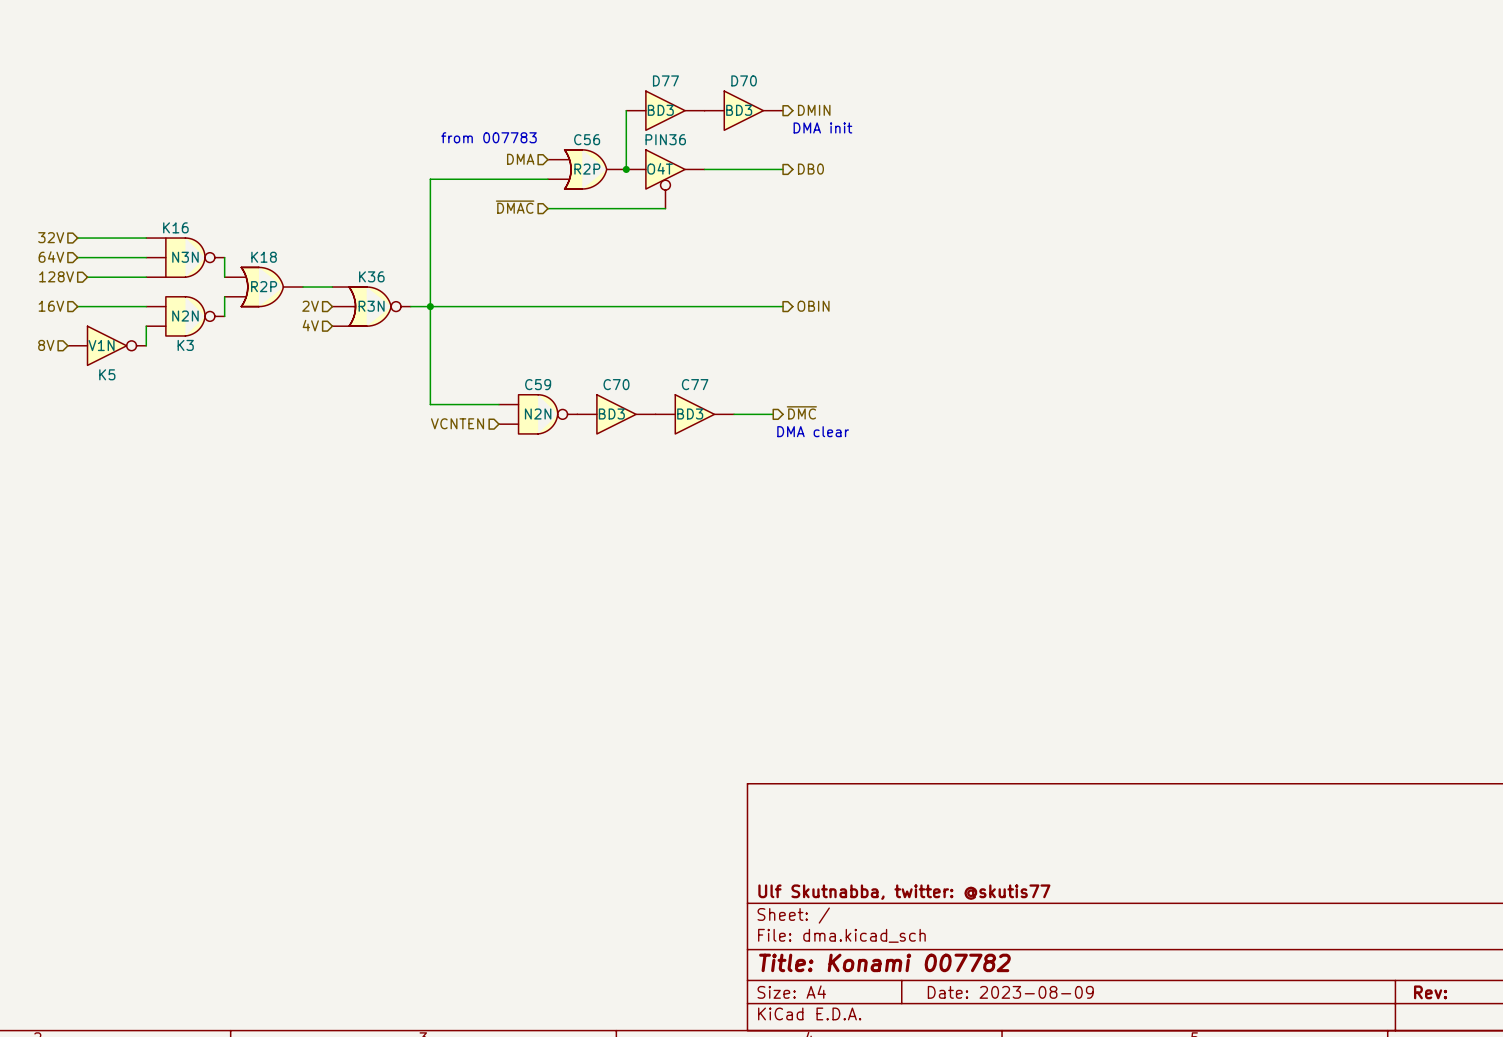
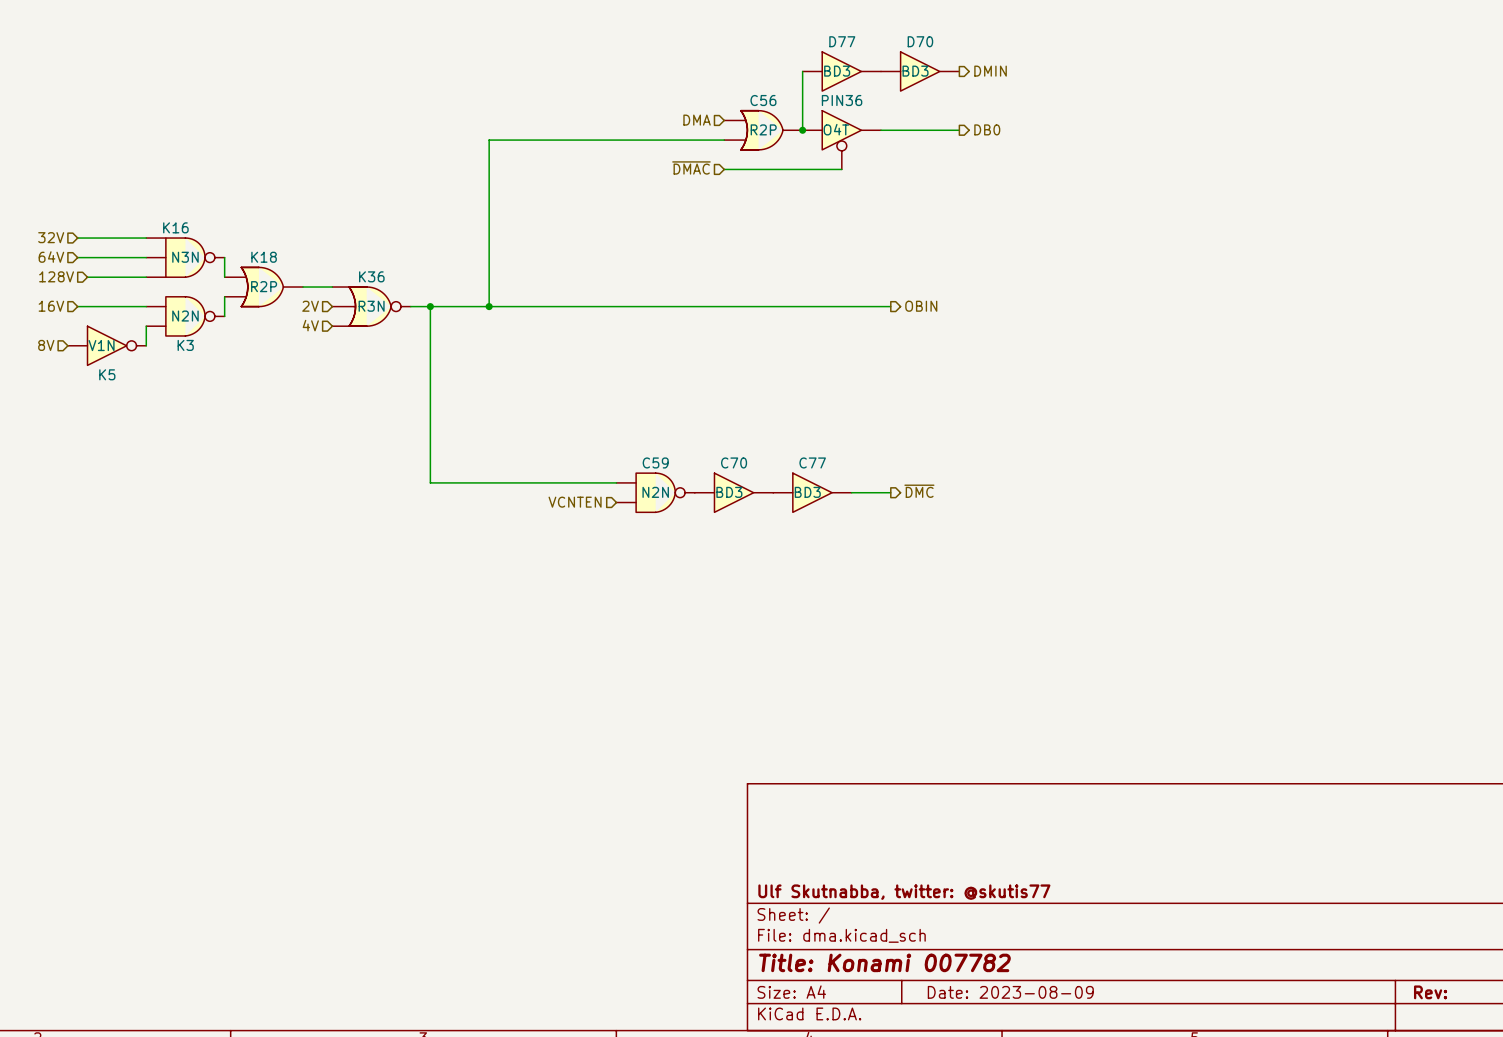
wire: (626, 110) (626, 169) -> (802, 71) (802, 130)
D77 position: (665, 110) -> (841, 71)
D70 position: (743, 110) -> (920, 71)
hierarchical label position: DMIN (814, 110) -> DMIN (990, 71)
text: DMA init (822, 127) -> none
junction: none -> (802, 130)
wire: none -> (881, 130) (959, 130)
text: from 007783 (488, 137) -> none
wire: none -> (724, 140) (489, 140) (489, 306)
hierarchical label position: DMA (520, 159) -> DMA (697, 120)
C56 position: (587, 169) -> (763, 130)
junction: (626, 169) -> none
wire: (704, 169) (724, 169) -> none
wire: none -> (783, 169) (841, 169)
hierarchical label position: DB0 (810, 169) -> DB0 (987, 129)
wire: (547, 179) (430, 179) (430, 306) -> none
PIN36 position: (665, 179) -> (841, 140)
hierarchical label position: ~{DMAC} (515, 207) -> ~{DMAC} (691, 167)
wire: (547, 208) (665, 208) -> none
junction: none -> (489, 306)
wire: none -> (783, 306) (890, 306)
hierarchical label position: OBIN (813, 306) -> OBIN (921, 306)
wire: (430, 404) (498, 404) -> (430, 404) (430, 482) (616, 482)
hierarchical label position: ~{DMC} (801, 412) -> ~{DMC} (919, 491)
C59 position: (538, 414) -> (655, 492)
C70 position: (616, 414) -> (734, 492)
C77 position: (694, 414) -> (812, 492)
wire: (734, 414) (773, 414) -> (851, 492) (890, 492)
hierarchical label position: VCNTEN (457, 423) -> VCNTEN (575, 502)
text: DMA clear (813, 431) -> none

